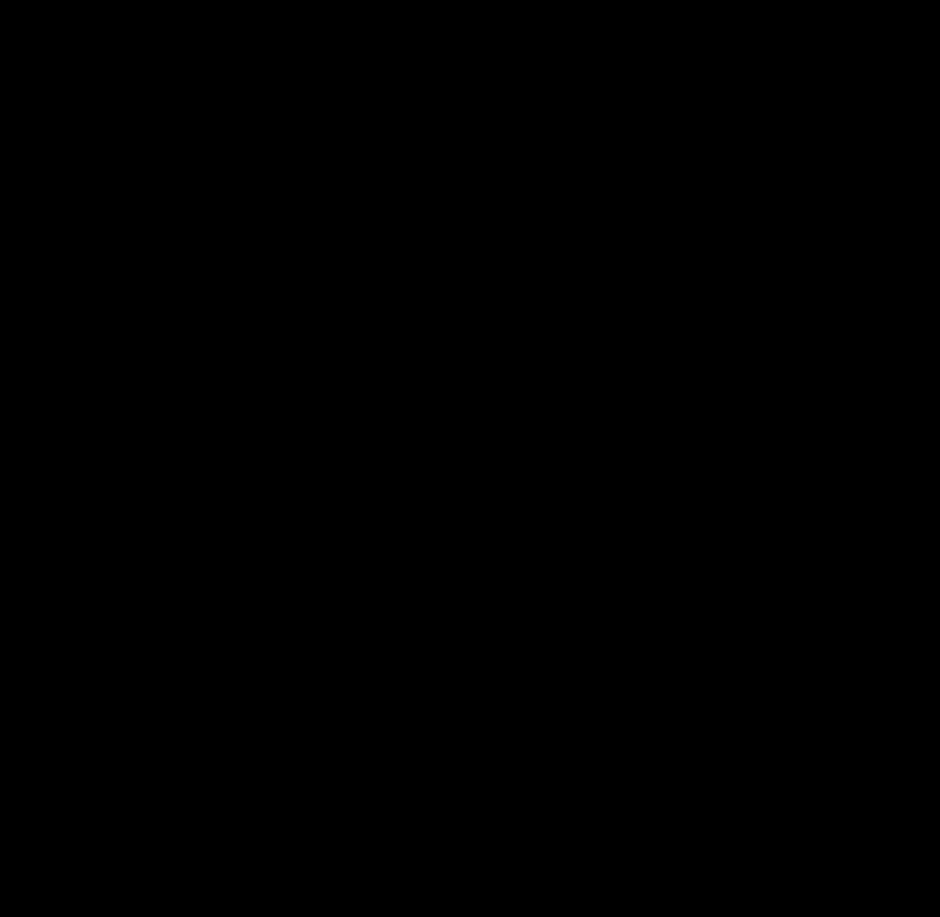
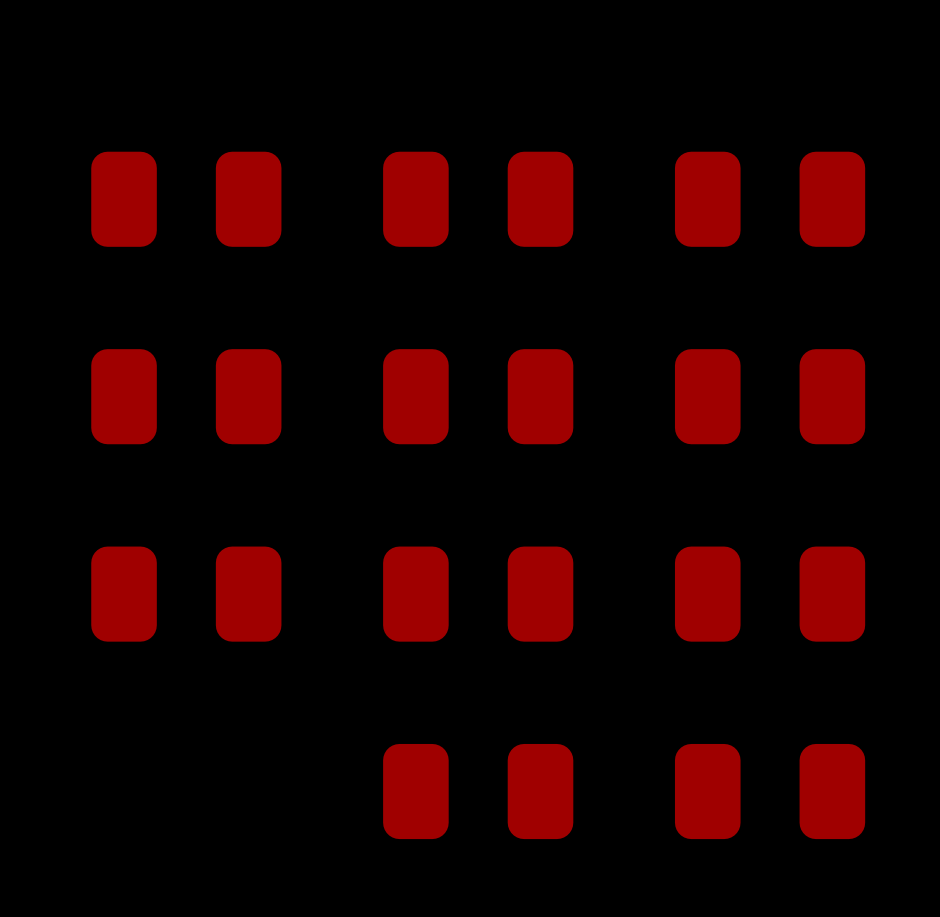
part: none -> (186, 199)
part: none -> (478, 199)
part: none -> (770, 199)
part: none -> (186, 396)
part: none -> (478, 396)
part: none -> (770, 396)
part: none -> (186, 594)
part: none -> (478, 594)
part: none -> (770, 594)
part: none -> (478, 791)
part: none -> (770, 791)

